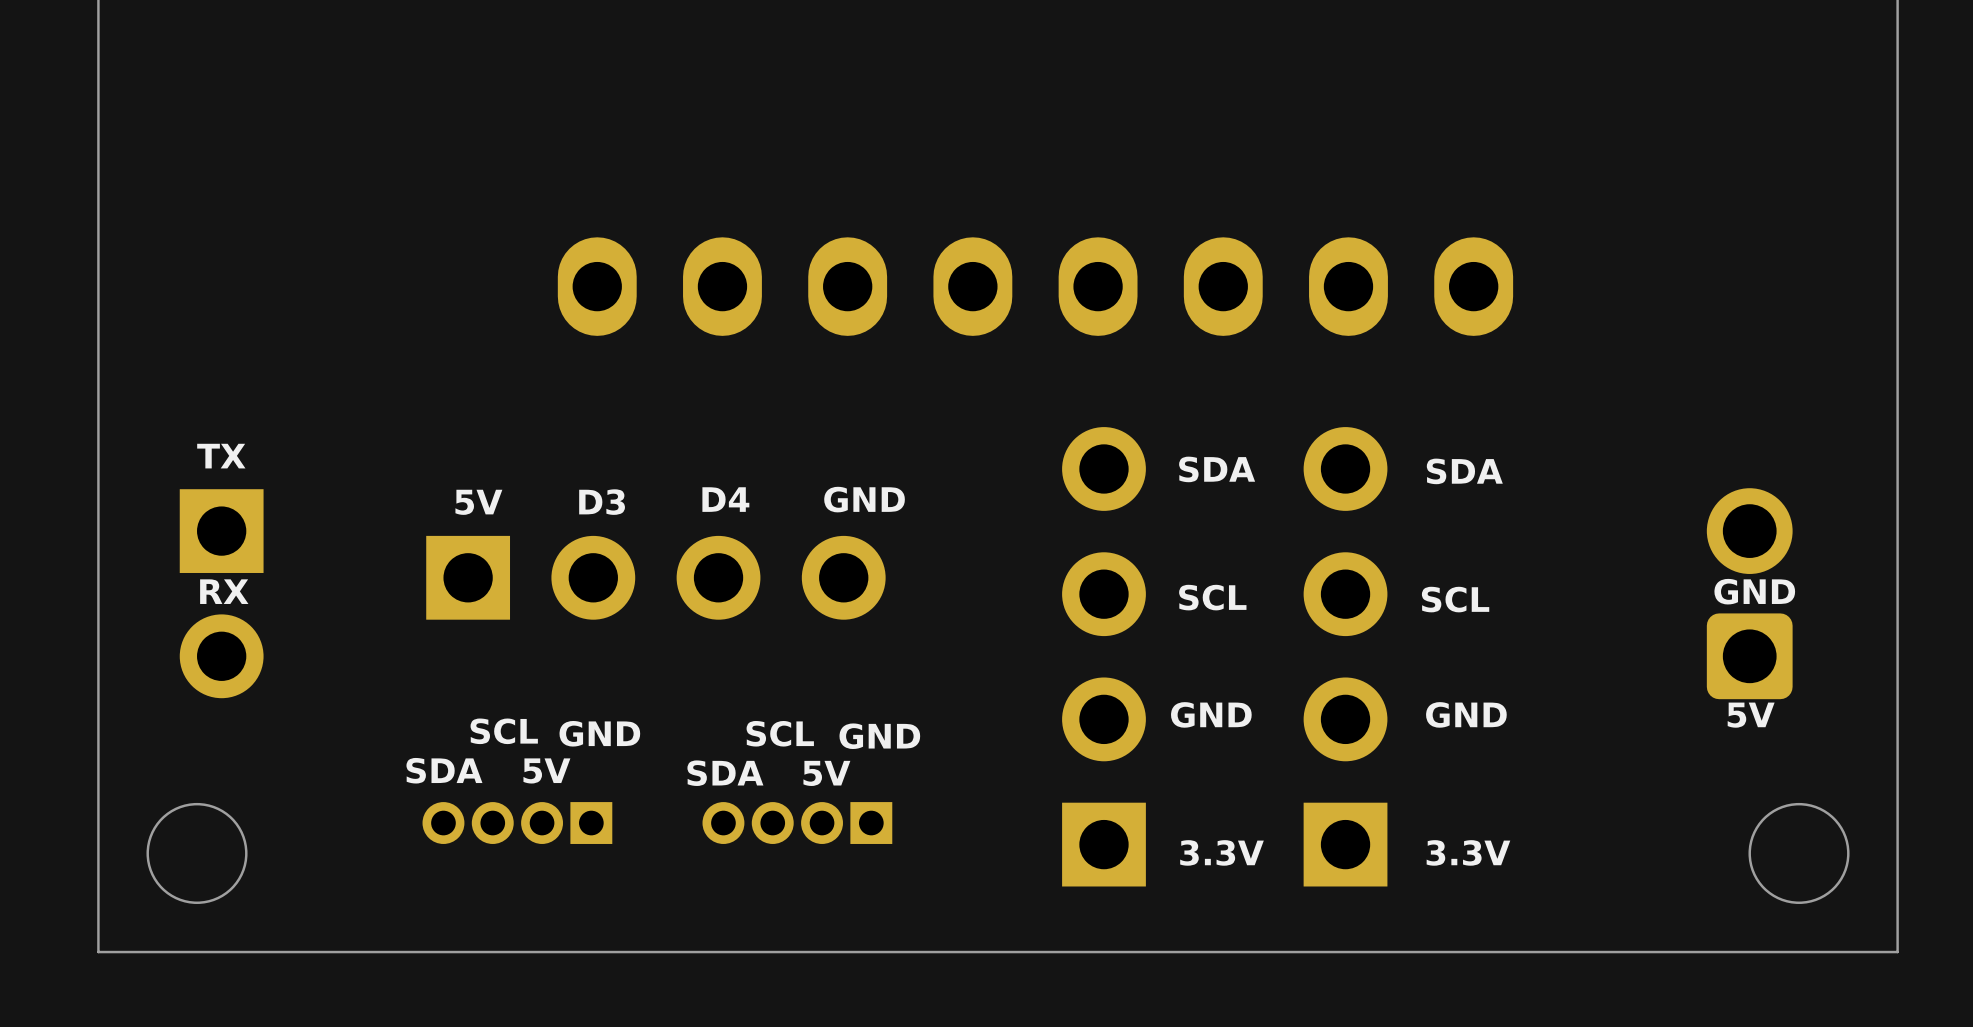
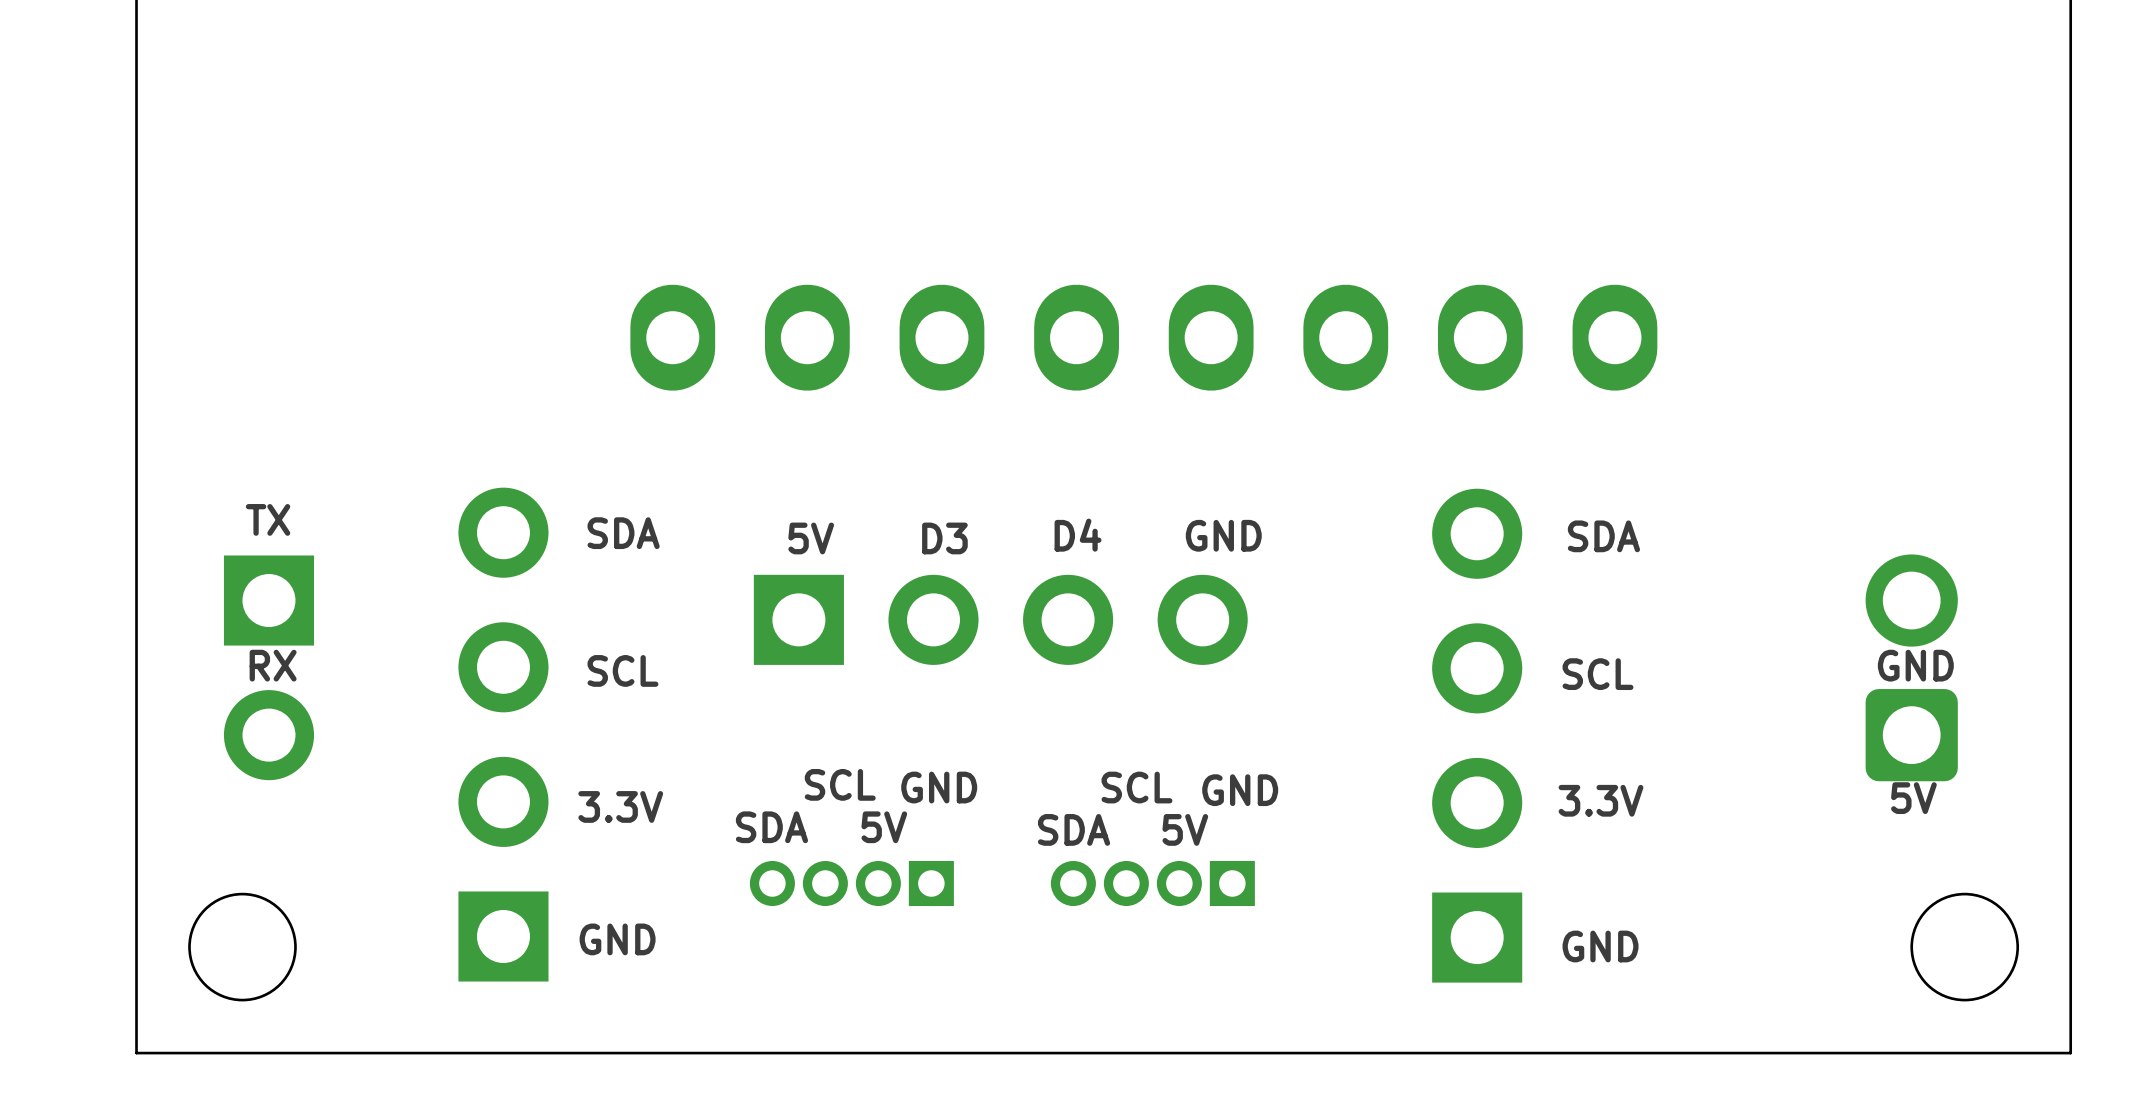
text: none -> SDA (623, 533)
text: SDA (1217, 469) -> none
text: none -> GND (1223, 535)
text: none -> 5V (811, 538)
text position: D4 (725, 499) -> D4 (1078, 535)
text: GND (864, 499) -> none
text: 5V (478, 502) -> none
text position: D3 (602, 502) -> D3 (944, 538)
part: none -> (1000, 619)
part: (655, 577) -> none
text position: SCL (1212, 597) -> SCL (1136, 787)
part: none -> (503, 734)
part: (1103, 656) -> none
text position: GND (1211, 714) -> GND (1240, 790)
text position: GND (1466, 714) -> GND (1600, 946)
text: none -> 3.3V (620, 806)
text position: SCL (504, 731) -> SCL (622, 670)
text position: GND (599, 733) -> GND (617, 939)
text position: SCL (780, 733) -> SCL (840, 784)
text position: GND (879, 736) -> GND (939, 787)
text: none -> SDA (1074, 829)
text: none -> 5V (1185, 829)
text: SDA (444, 770) -> none
text: 5V (546, 770) -> none
text position: SDA (725, 773) -> SDA (771, 827)
text position: 5V (826, 773) -> 5V (884, 827)
part position: (517, 823) -> (1152, 883)
part position: (797, 823) -> (851, 883)
text: 3.3V (1222, 852) -> none
text position: 3.3V (1468, 852) -> 3.3V (1600, 800)

